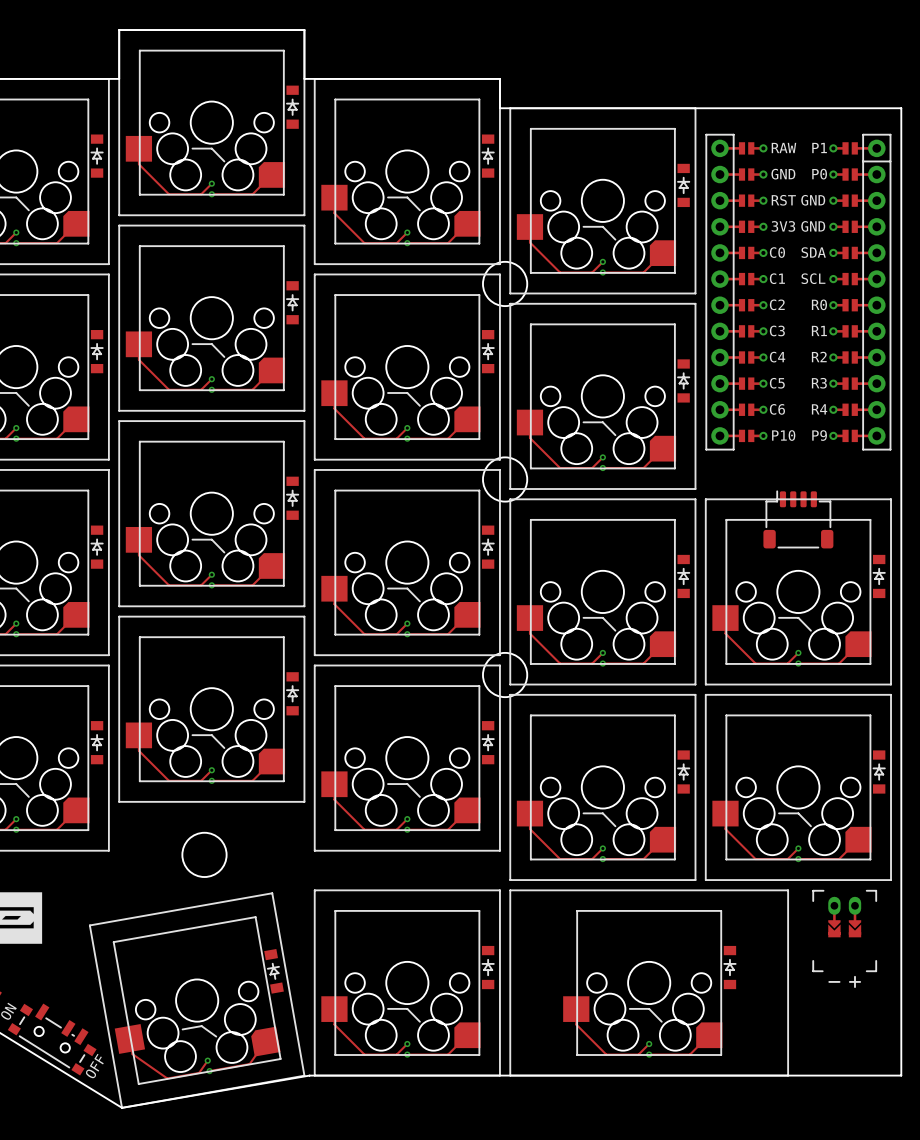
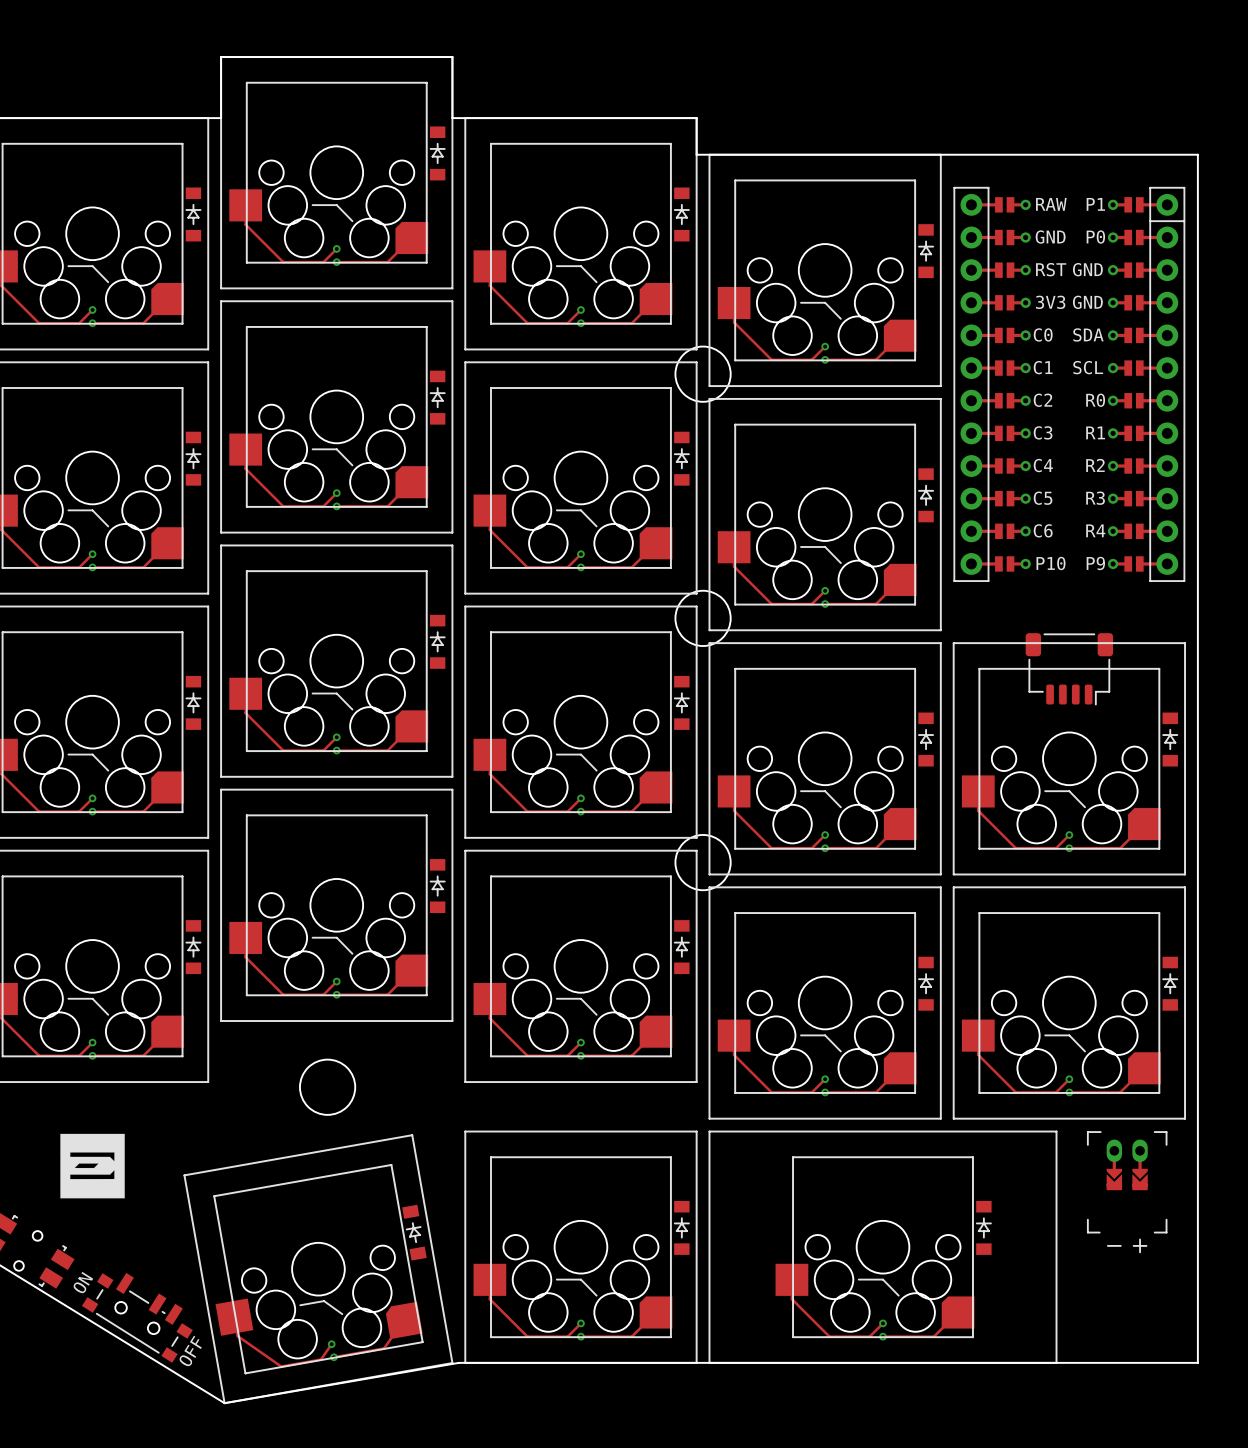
part rotation: 0° (798, 519) -> 180° (1069, 669)

